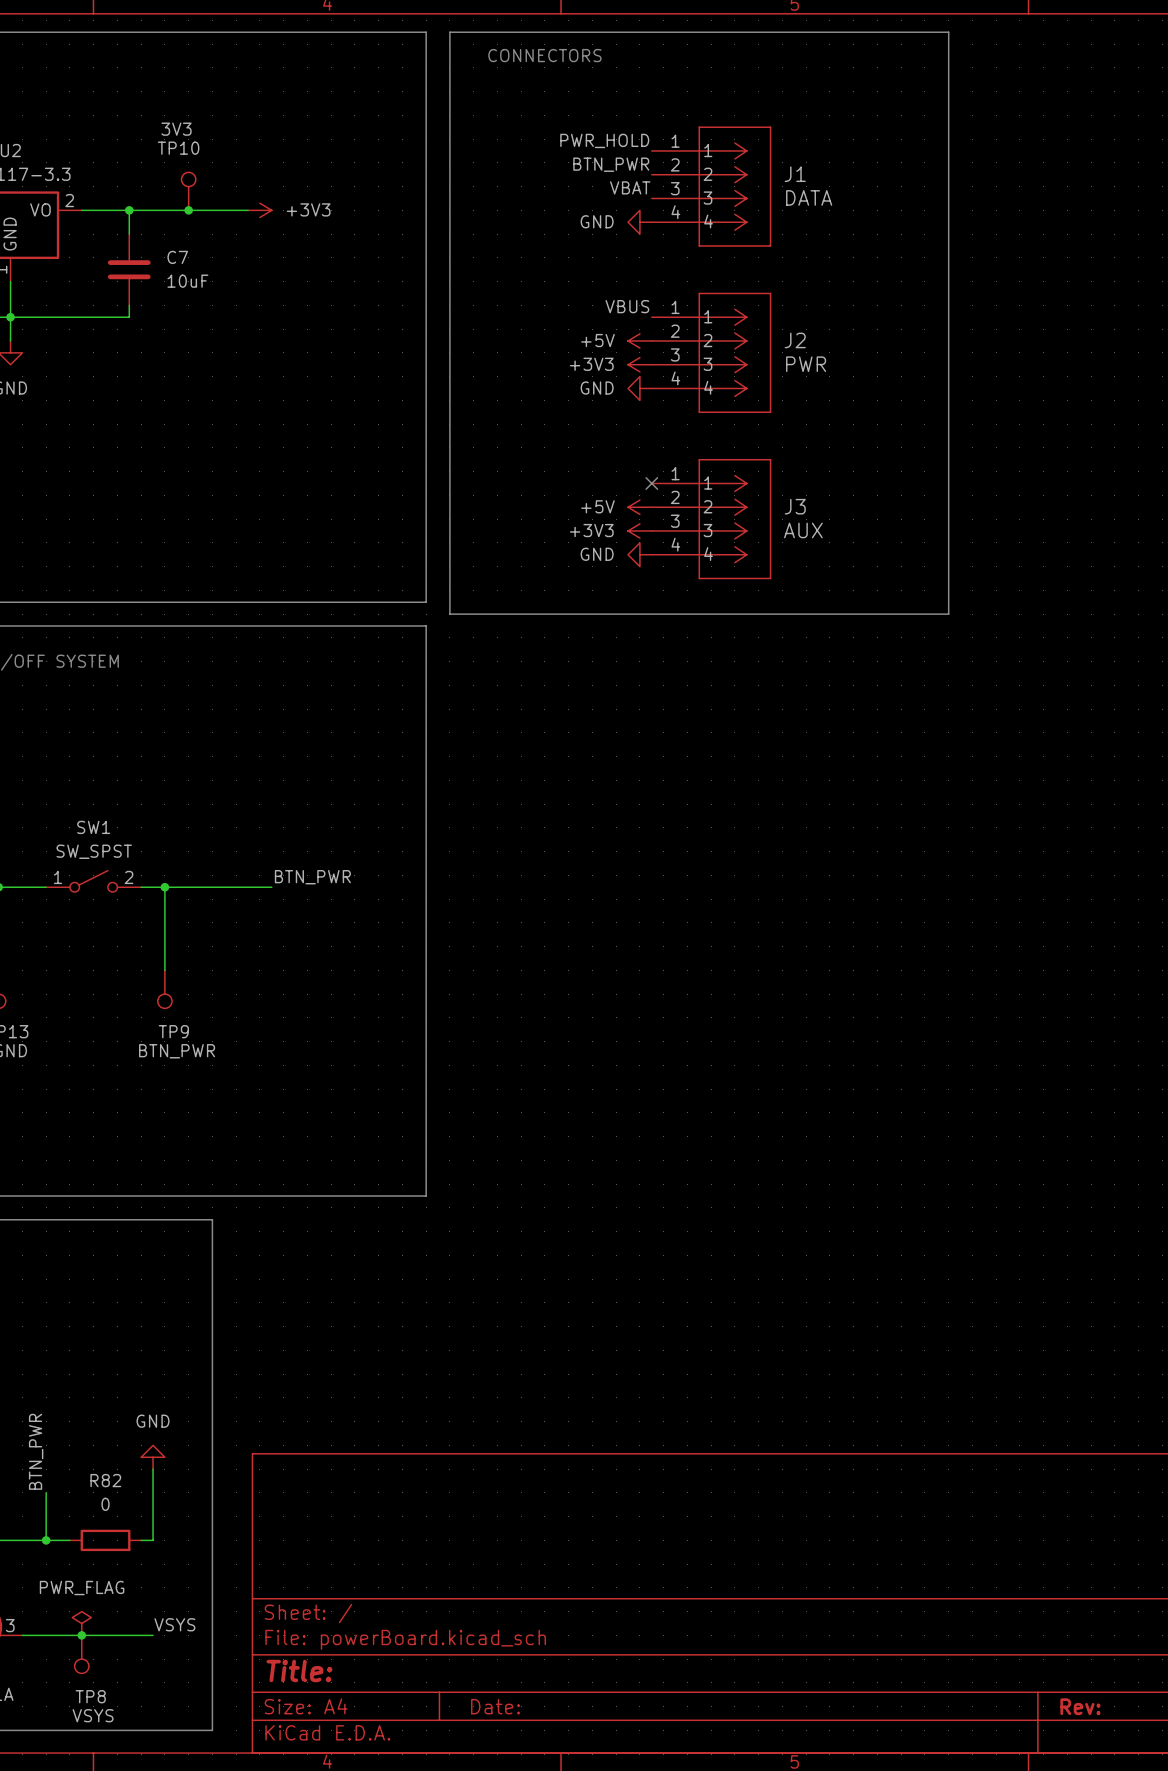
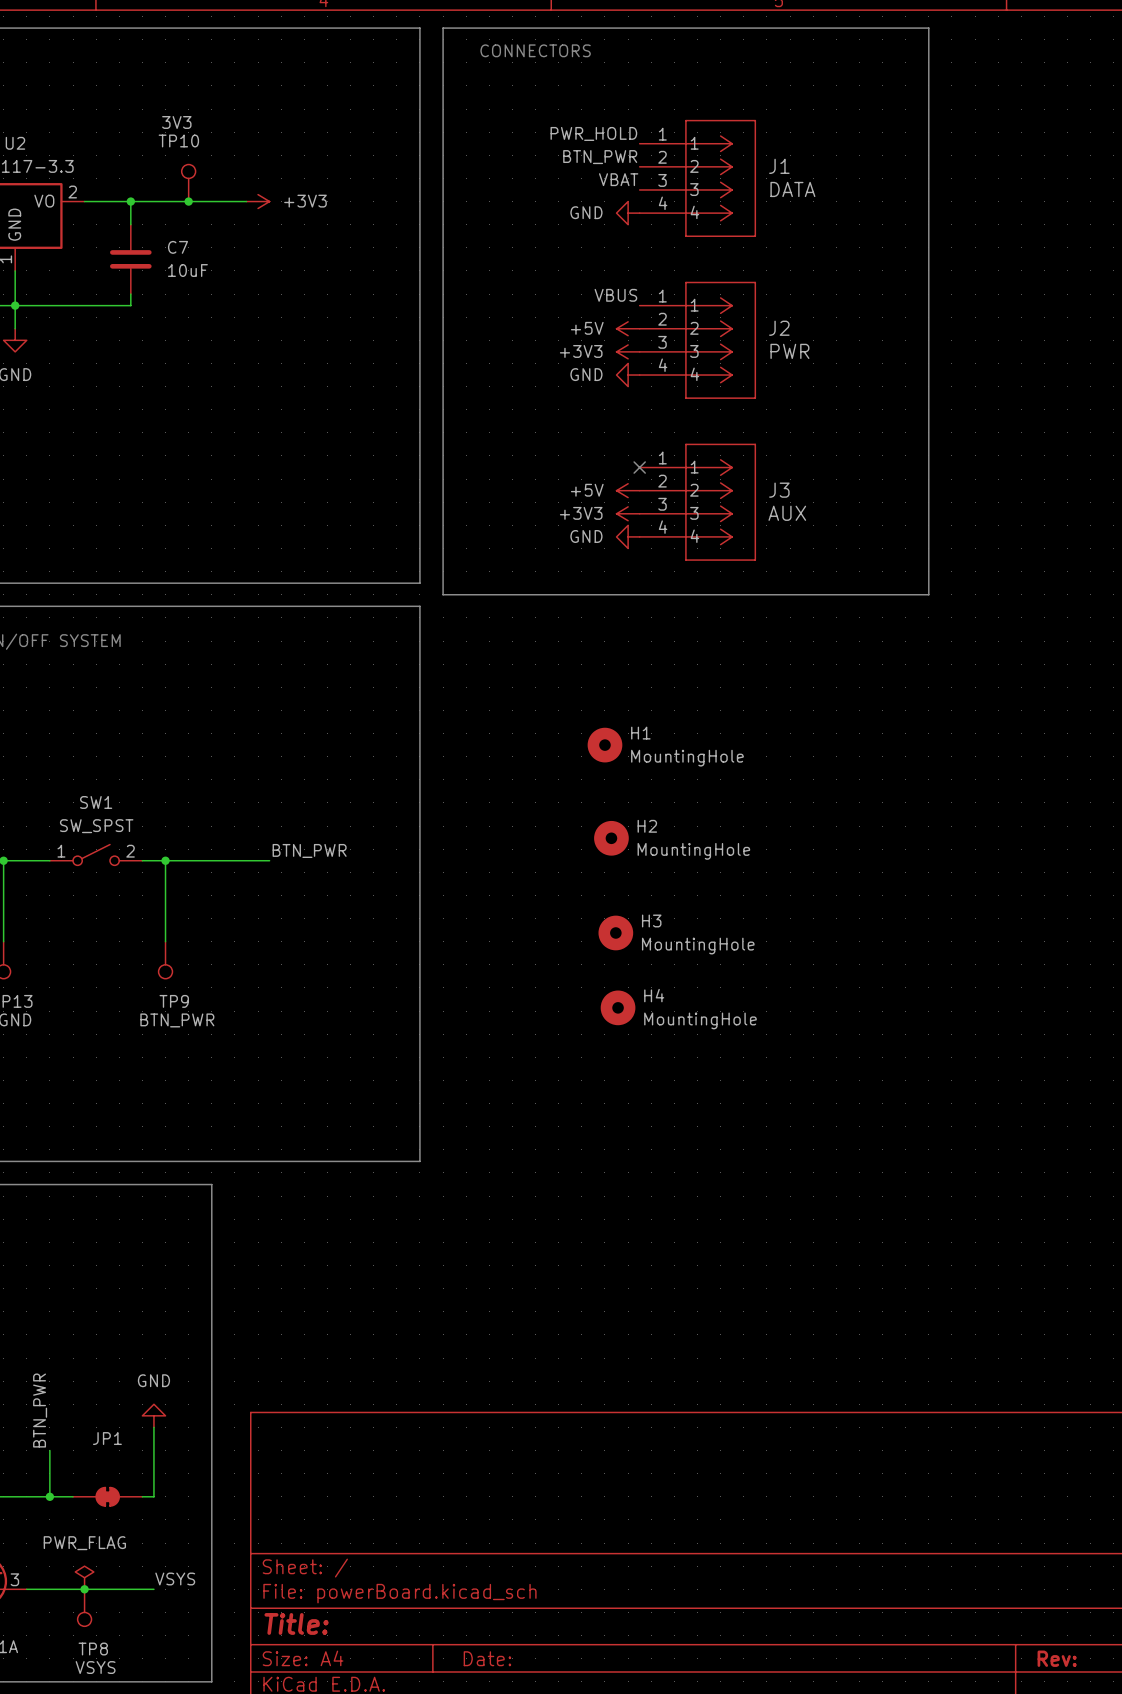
H1: none -> MountingHole (604, 745)
H2: none -> MountingHole (611, 838)
H3: none -> MountingHole (615, 932)
H4: none -> MountingHole (618, 1007)
R82: 0 (105, 1540) -> none
JP1: none -> (107, 1496)

